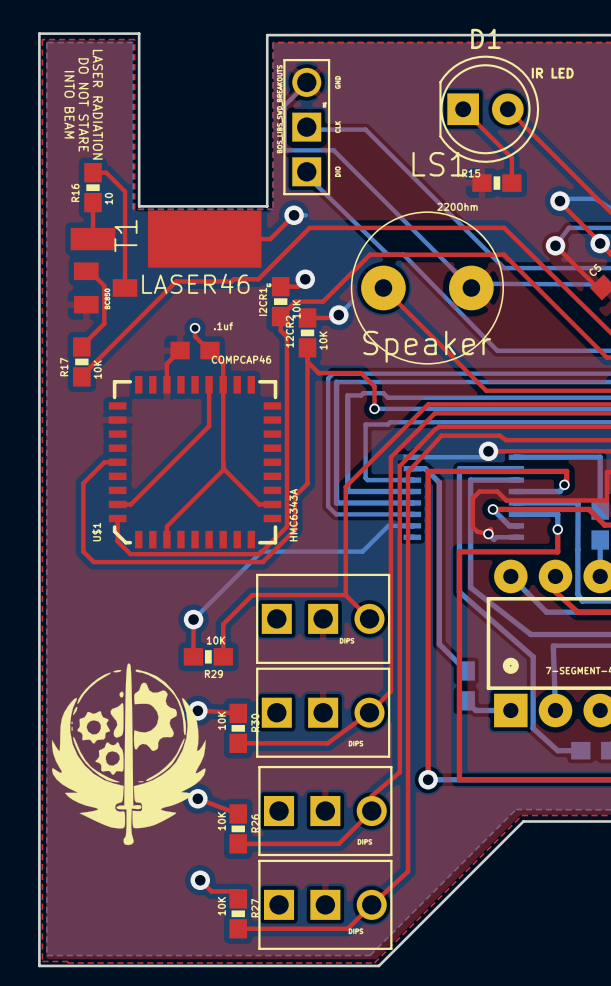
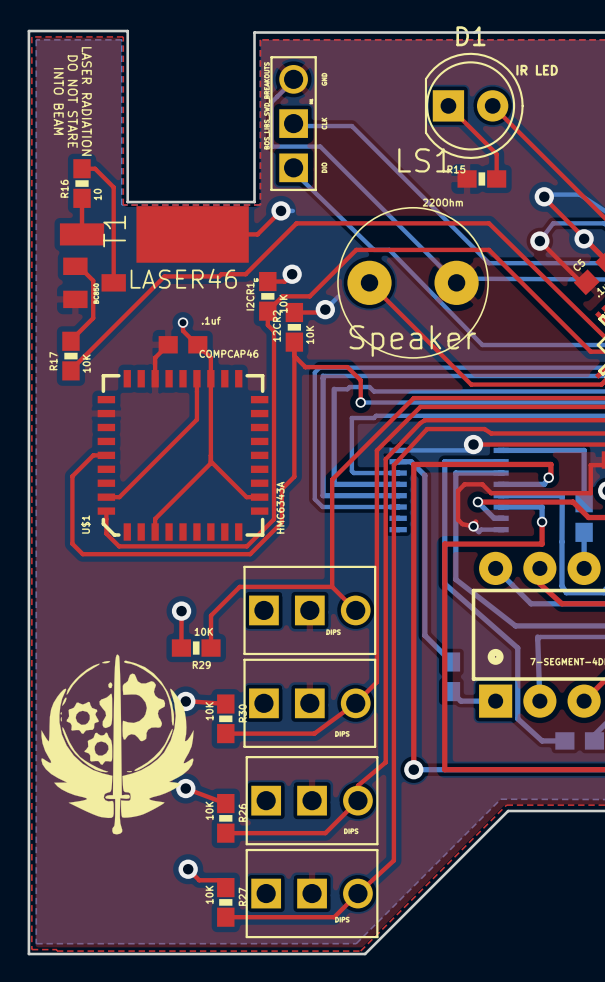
bottom track: (404, 525) (388, 525) (362, 551) (261, 551) (193, 619) -> none

